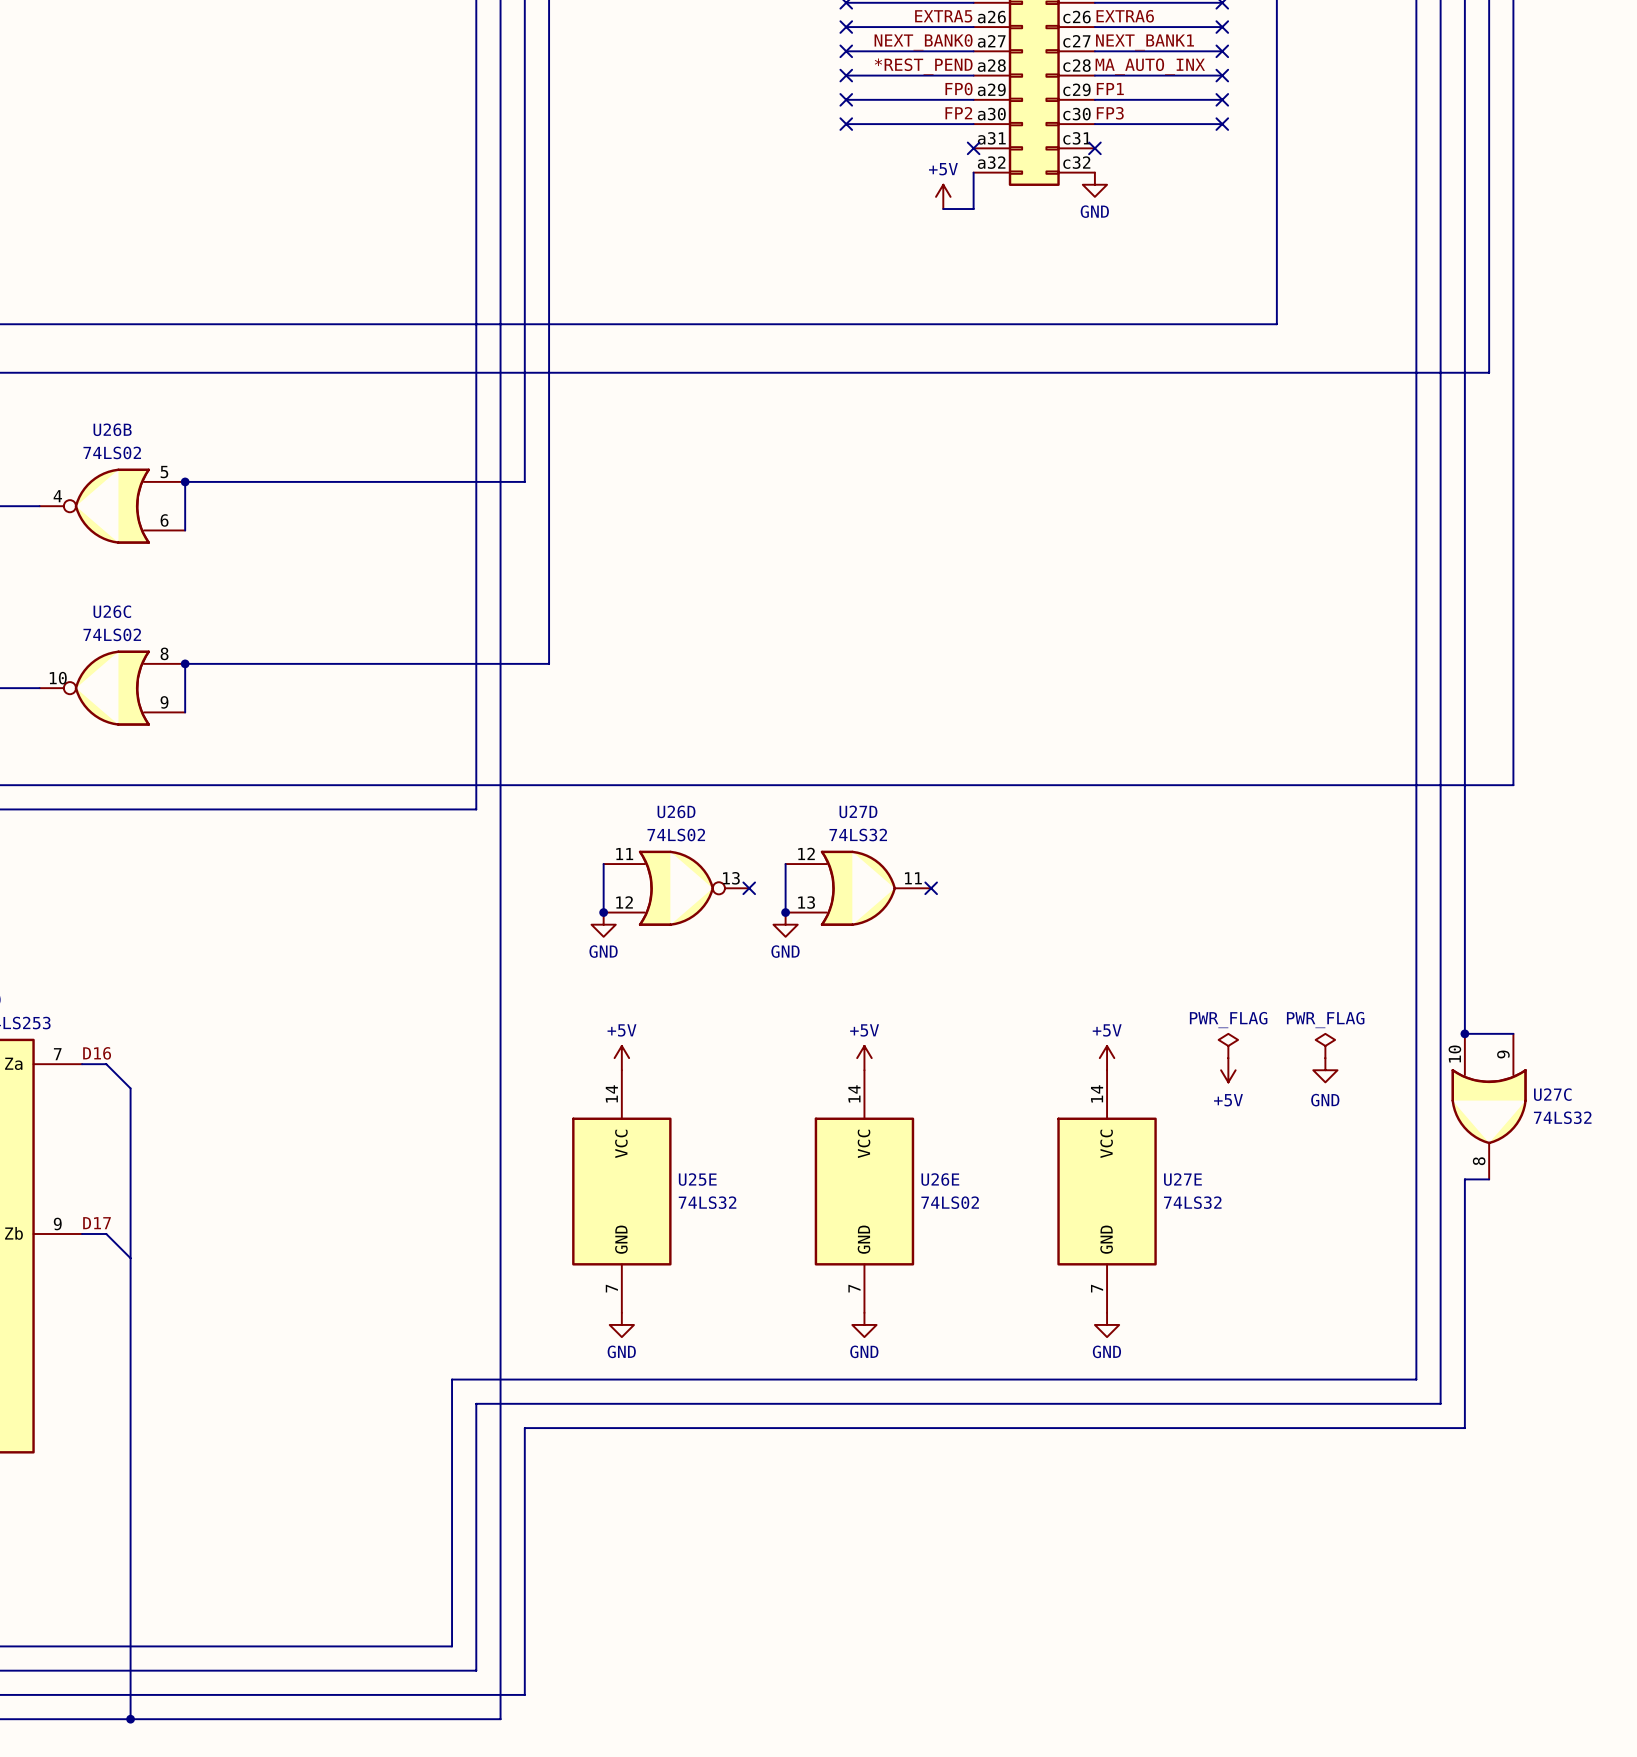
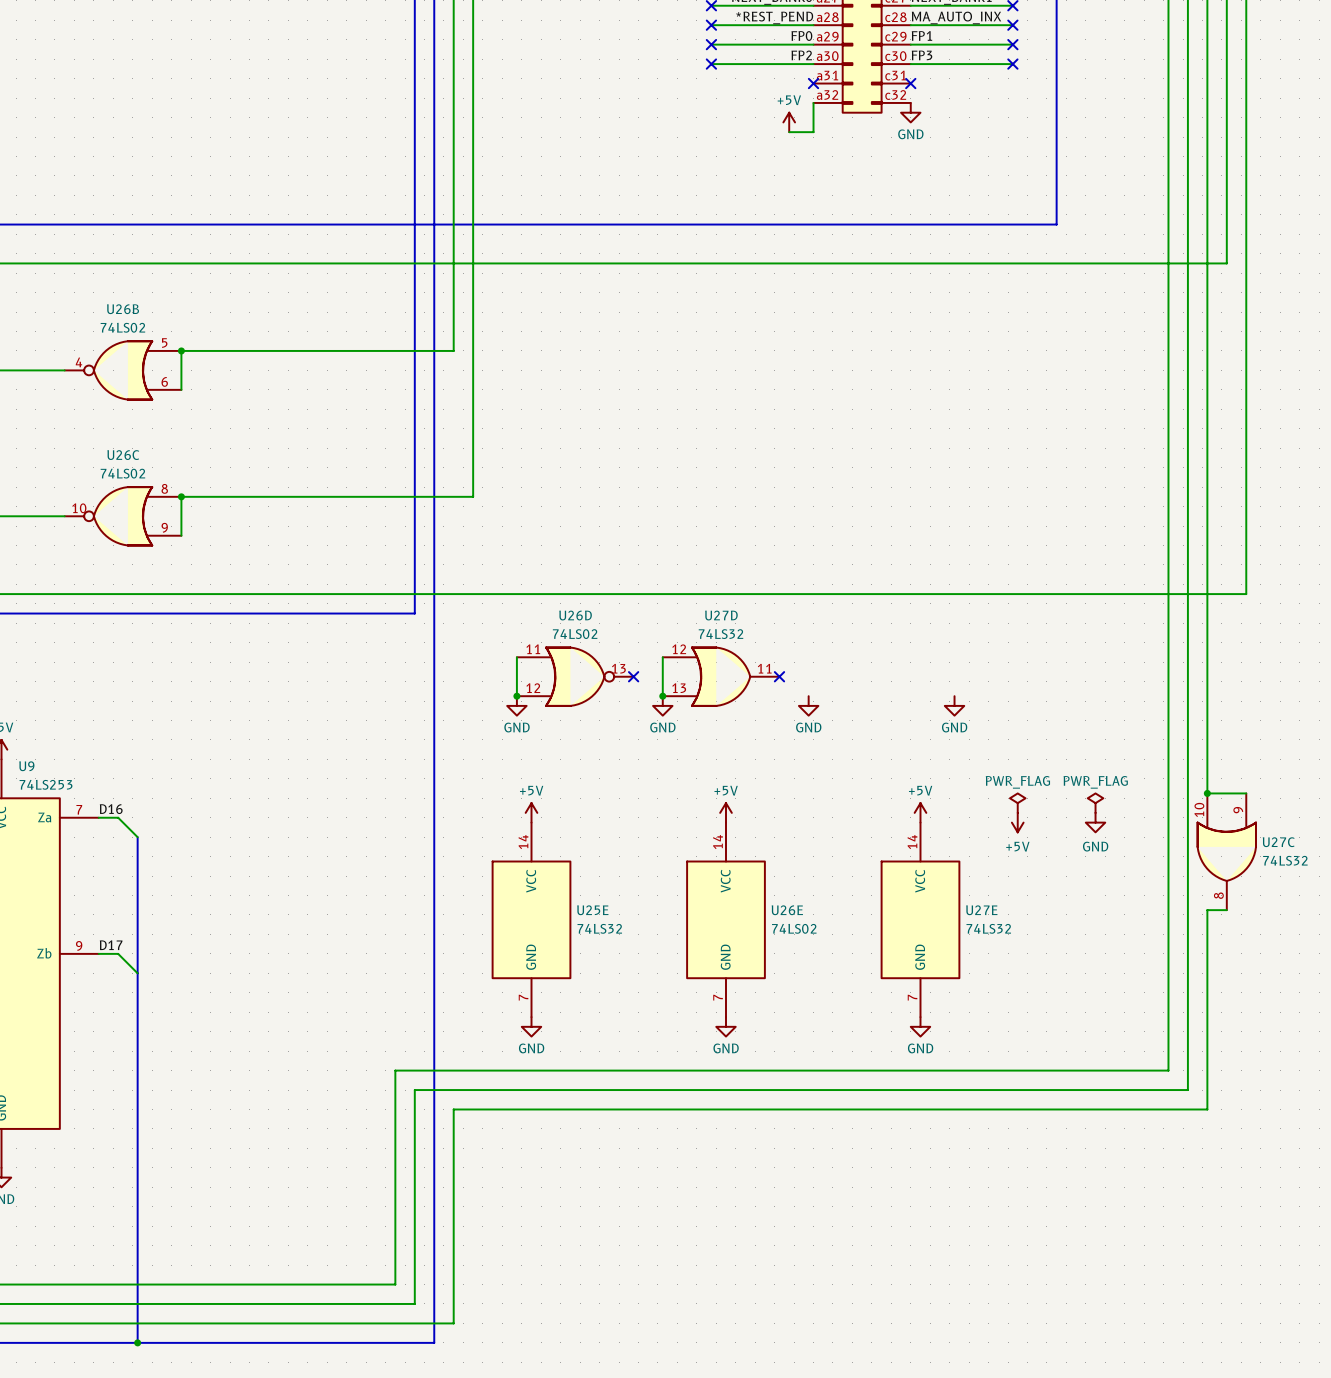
power symbol: none -> GND (808, 705)
power symbol: none -> GND (954, 705)

